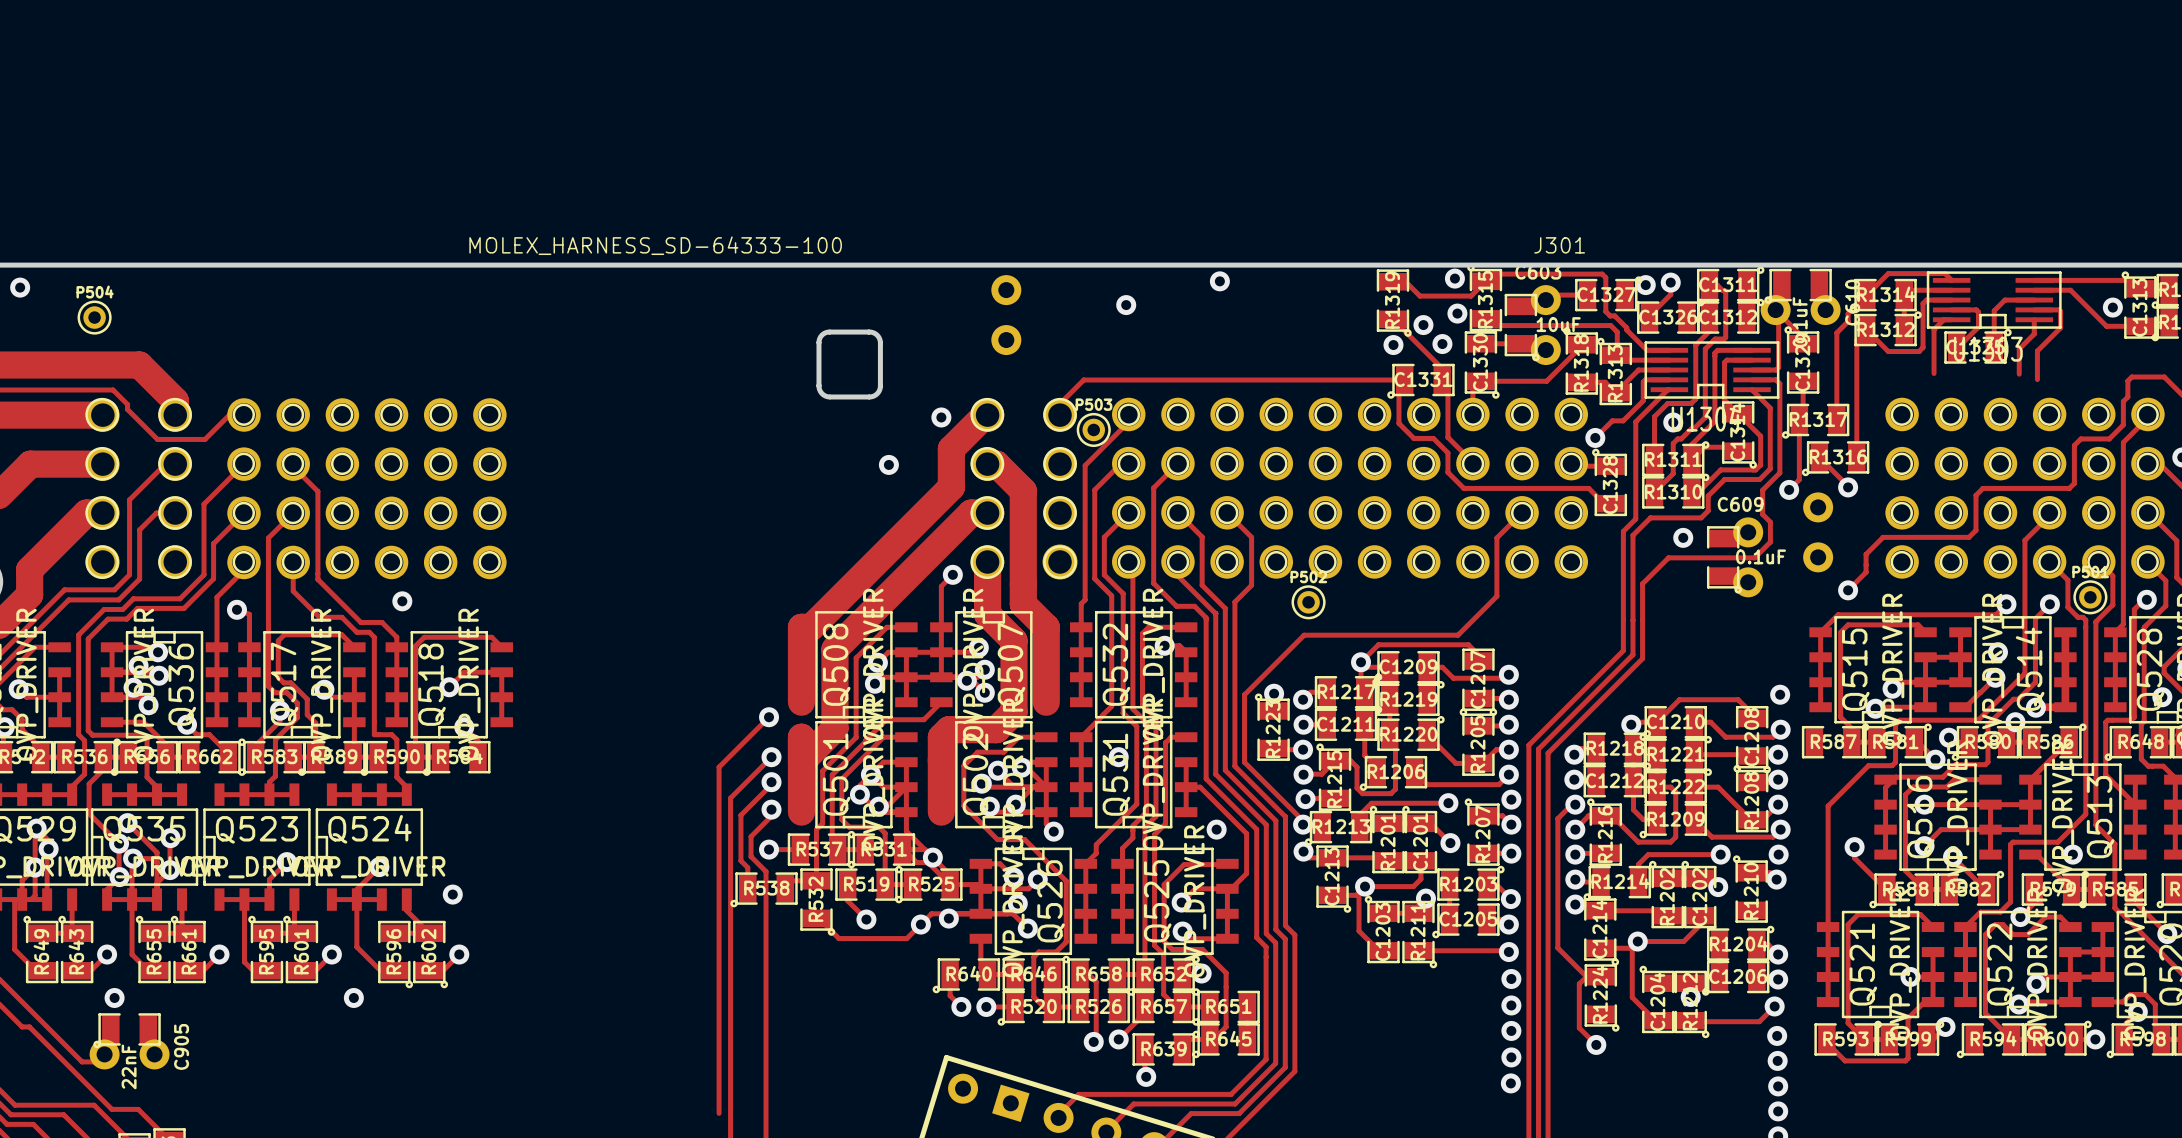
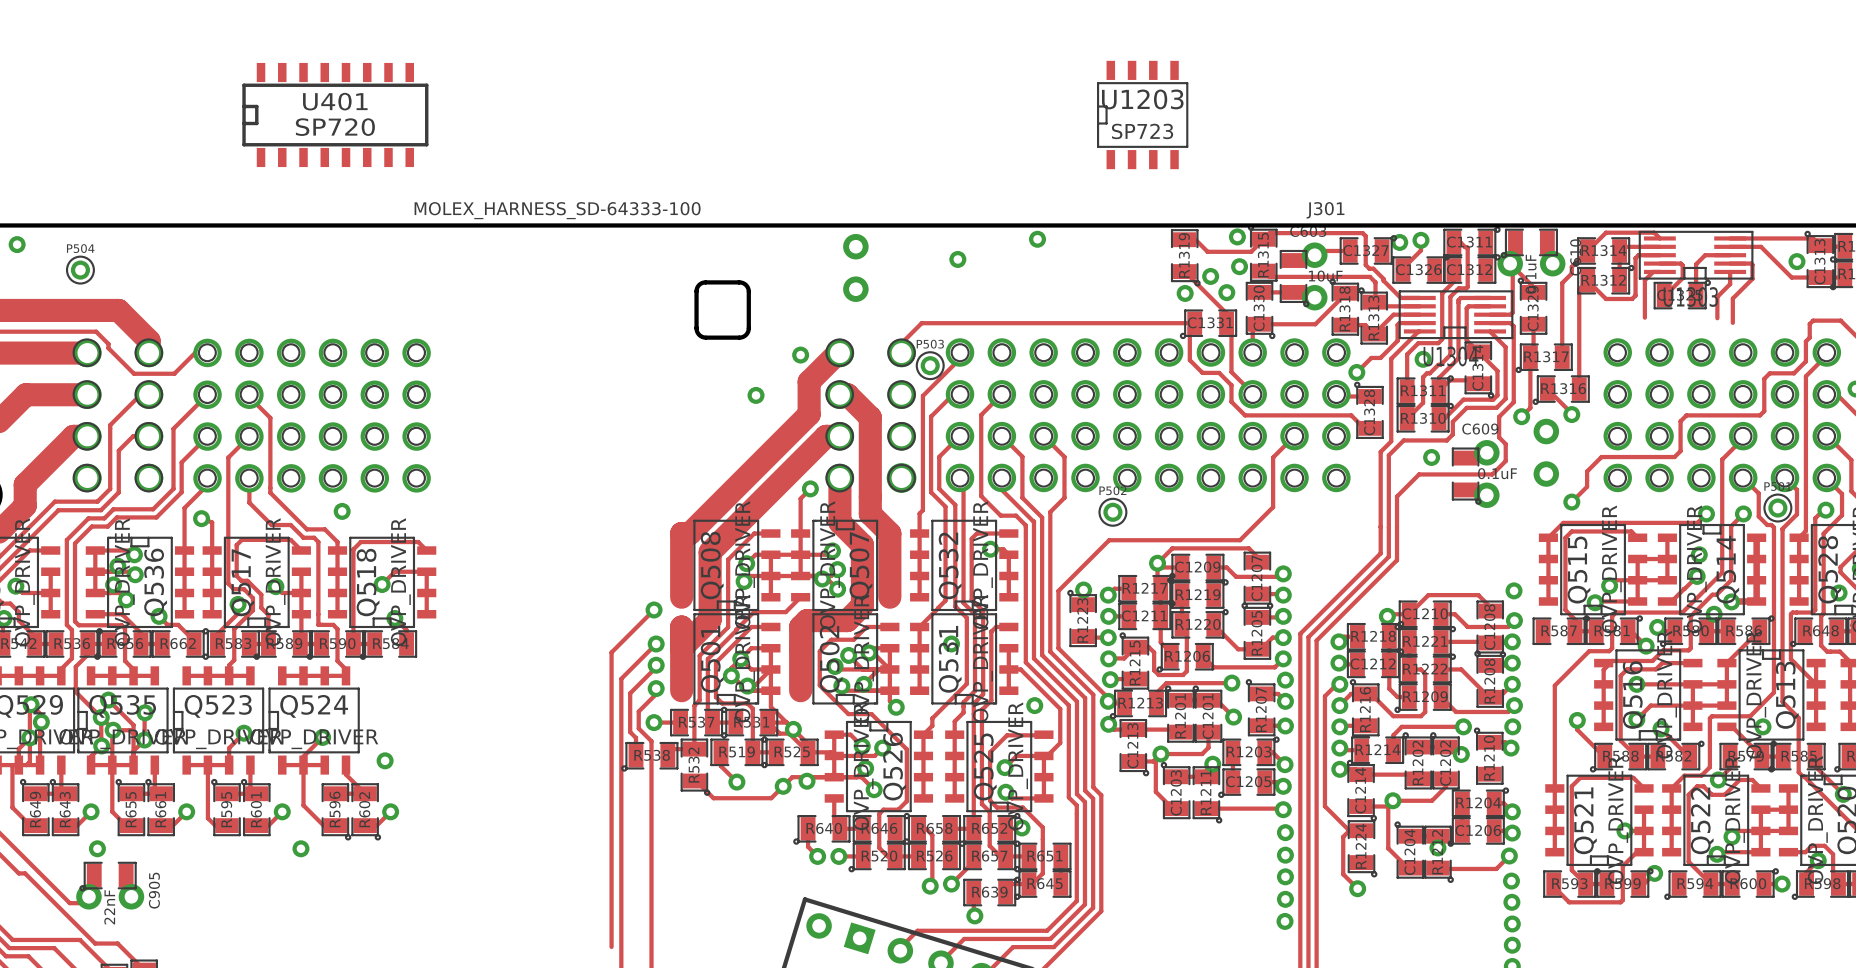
U401: none -> SP720 (335, 115)
U1203: none -> SP723 (1142, 115)

